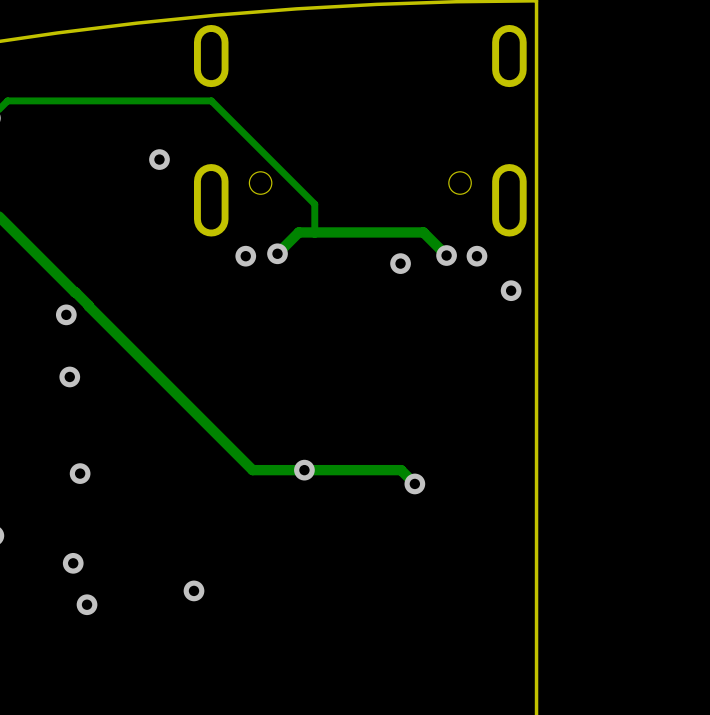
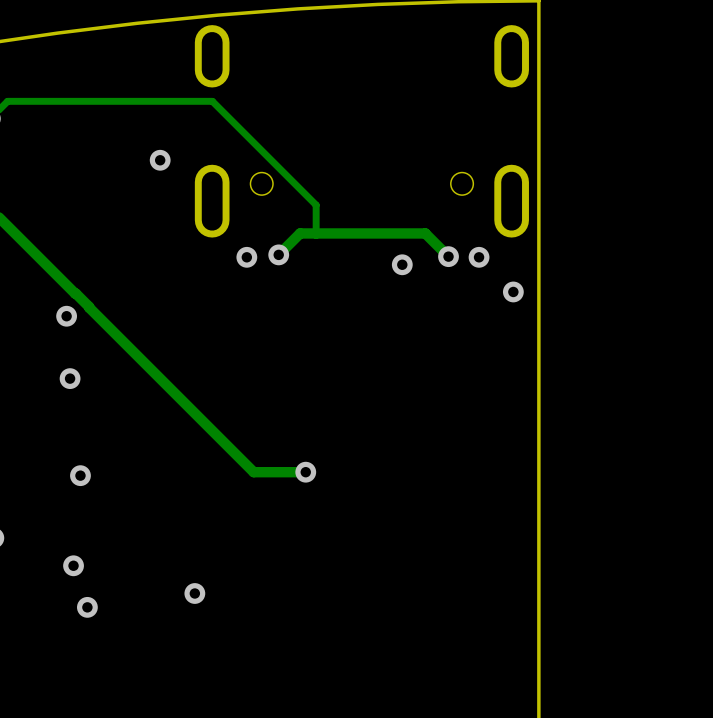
track: (304, 470) (401, 470) (414, 483) -> none
via: (414, 483) -> none

